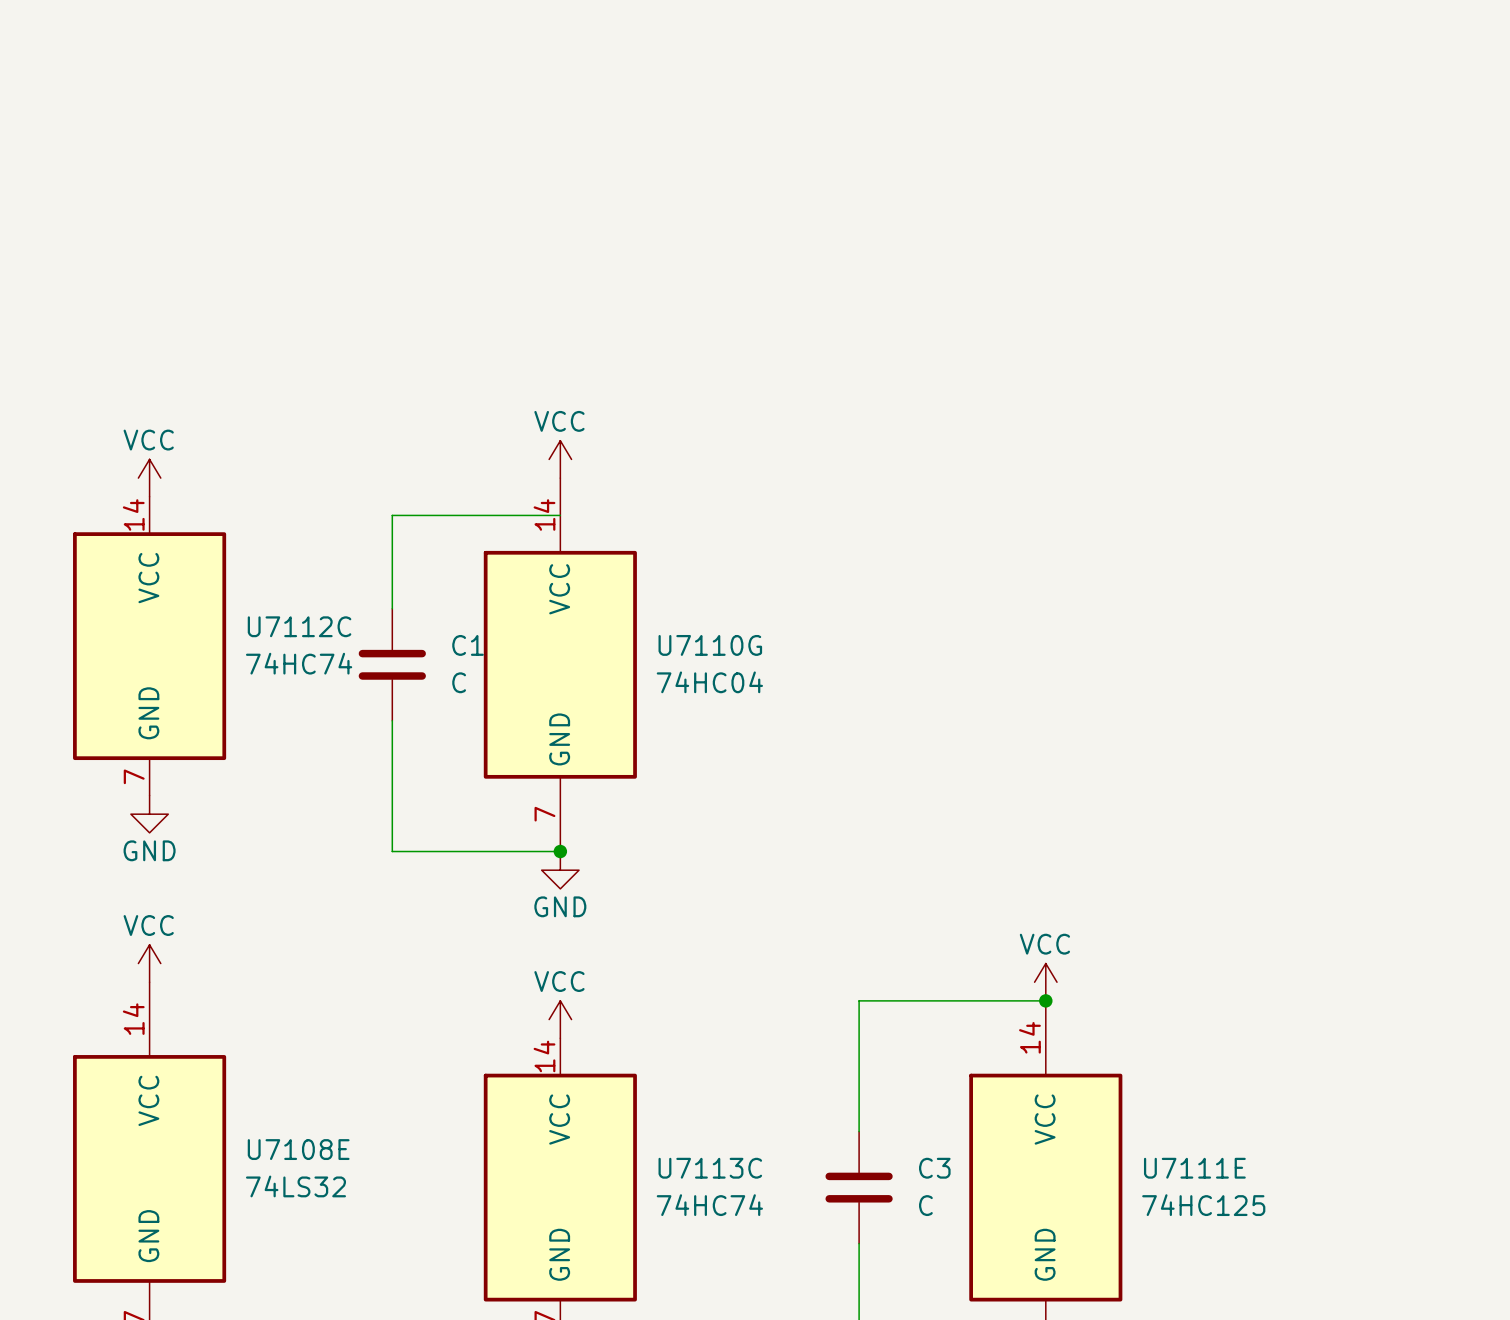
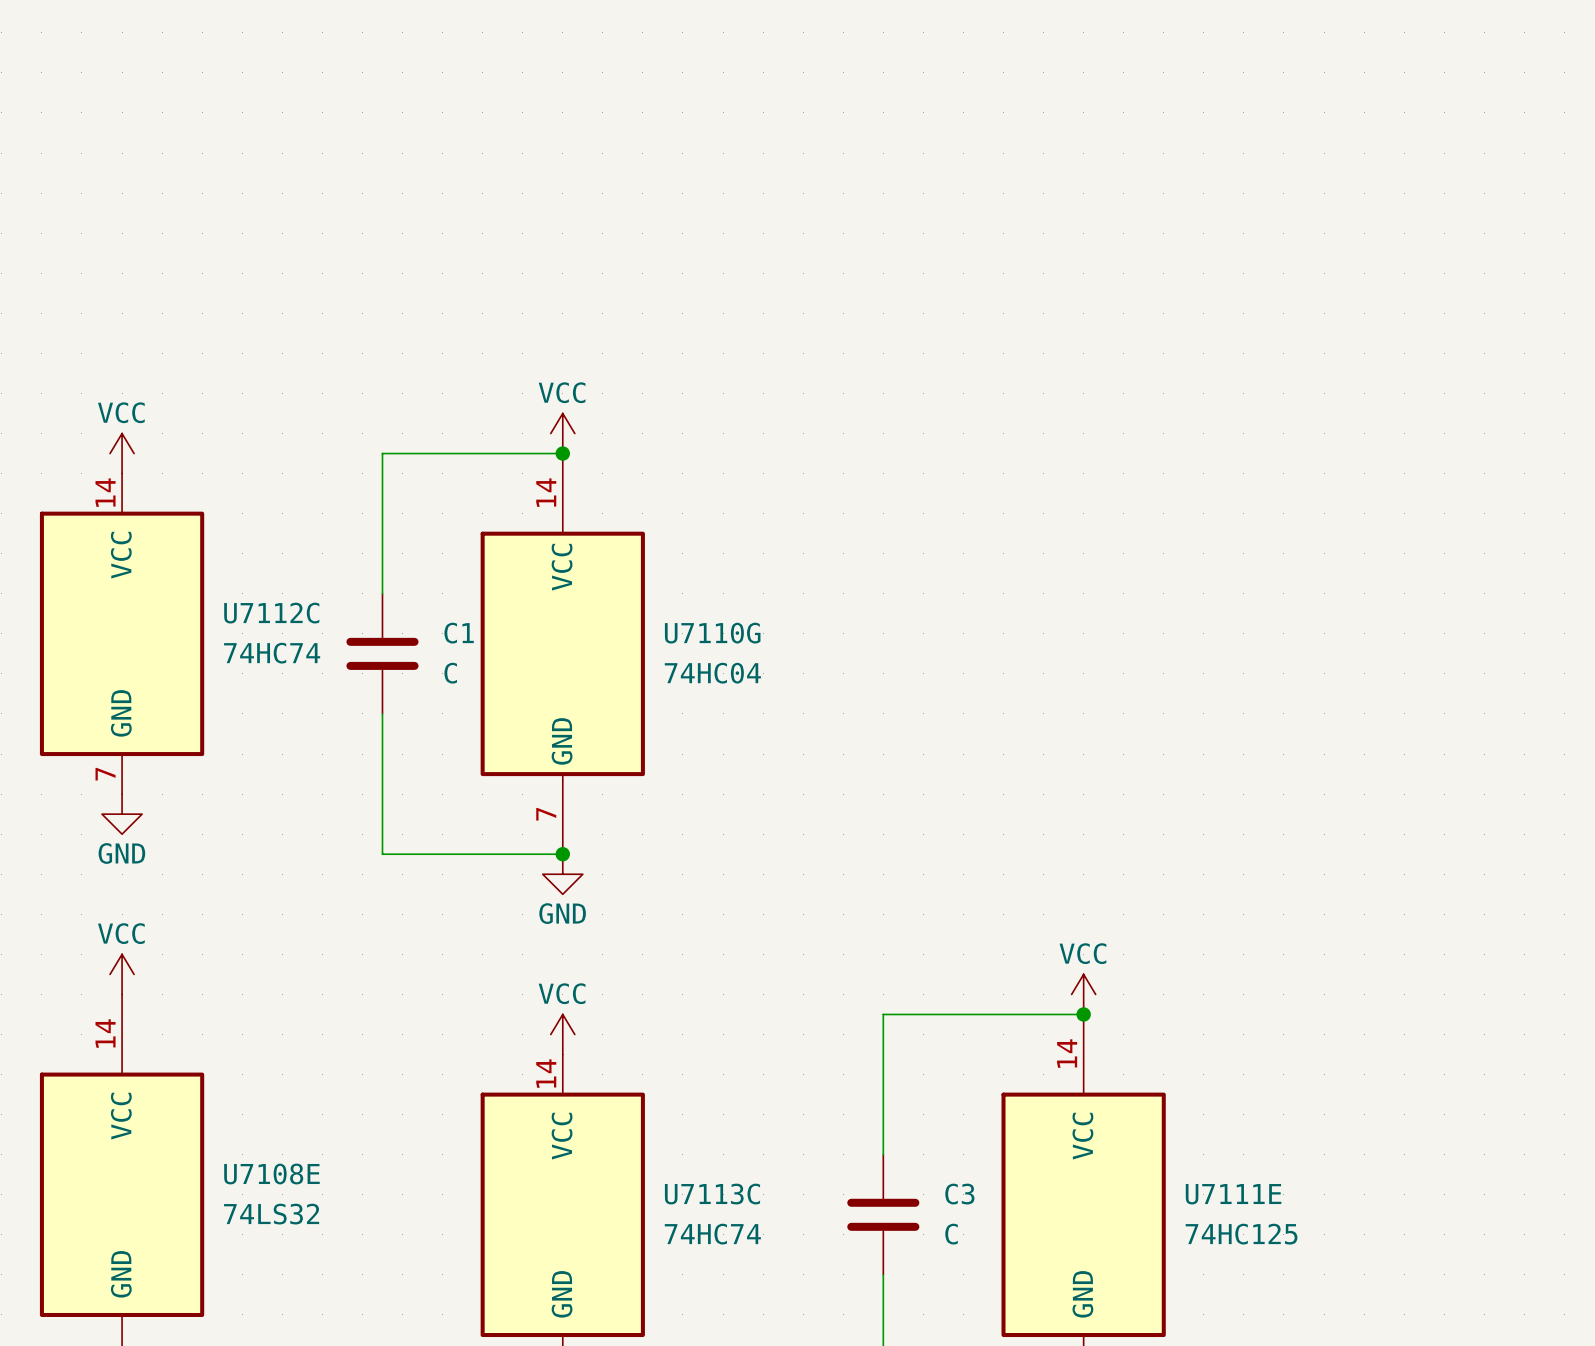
junction: none -> (562, 453)
wire: (392, 515) (560, 515) -> (382, 493) (382, 453) (562, 453)

